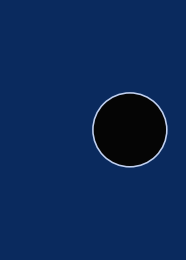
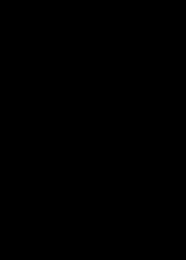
part: (129, 129) -> none

